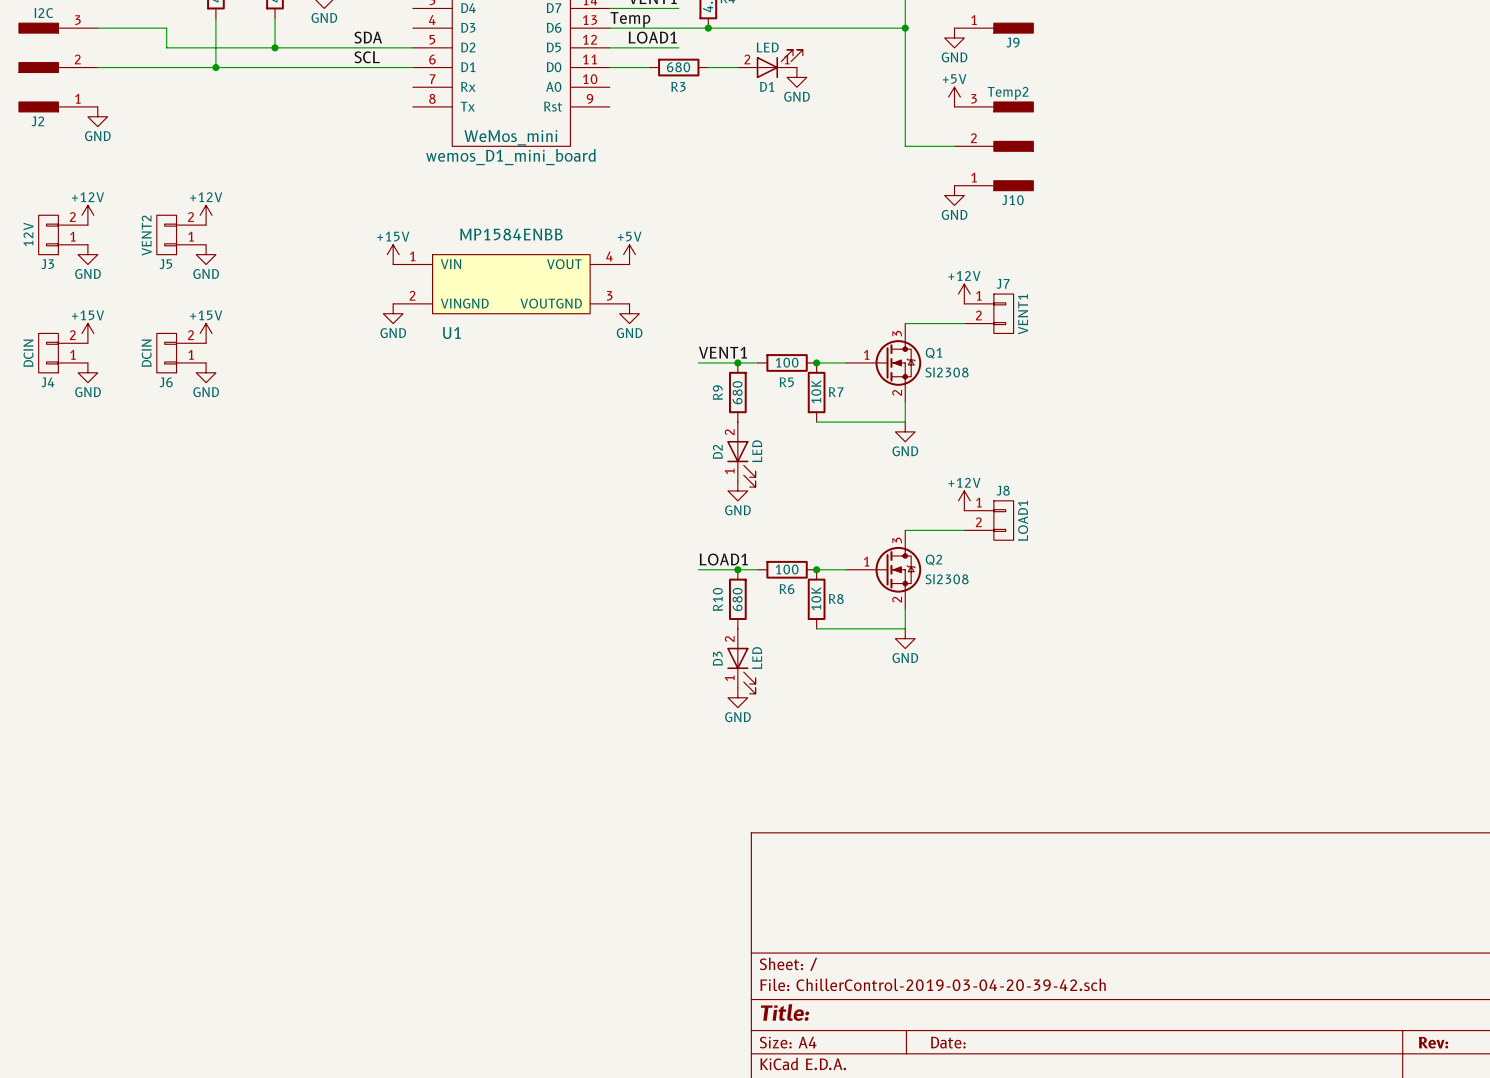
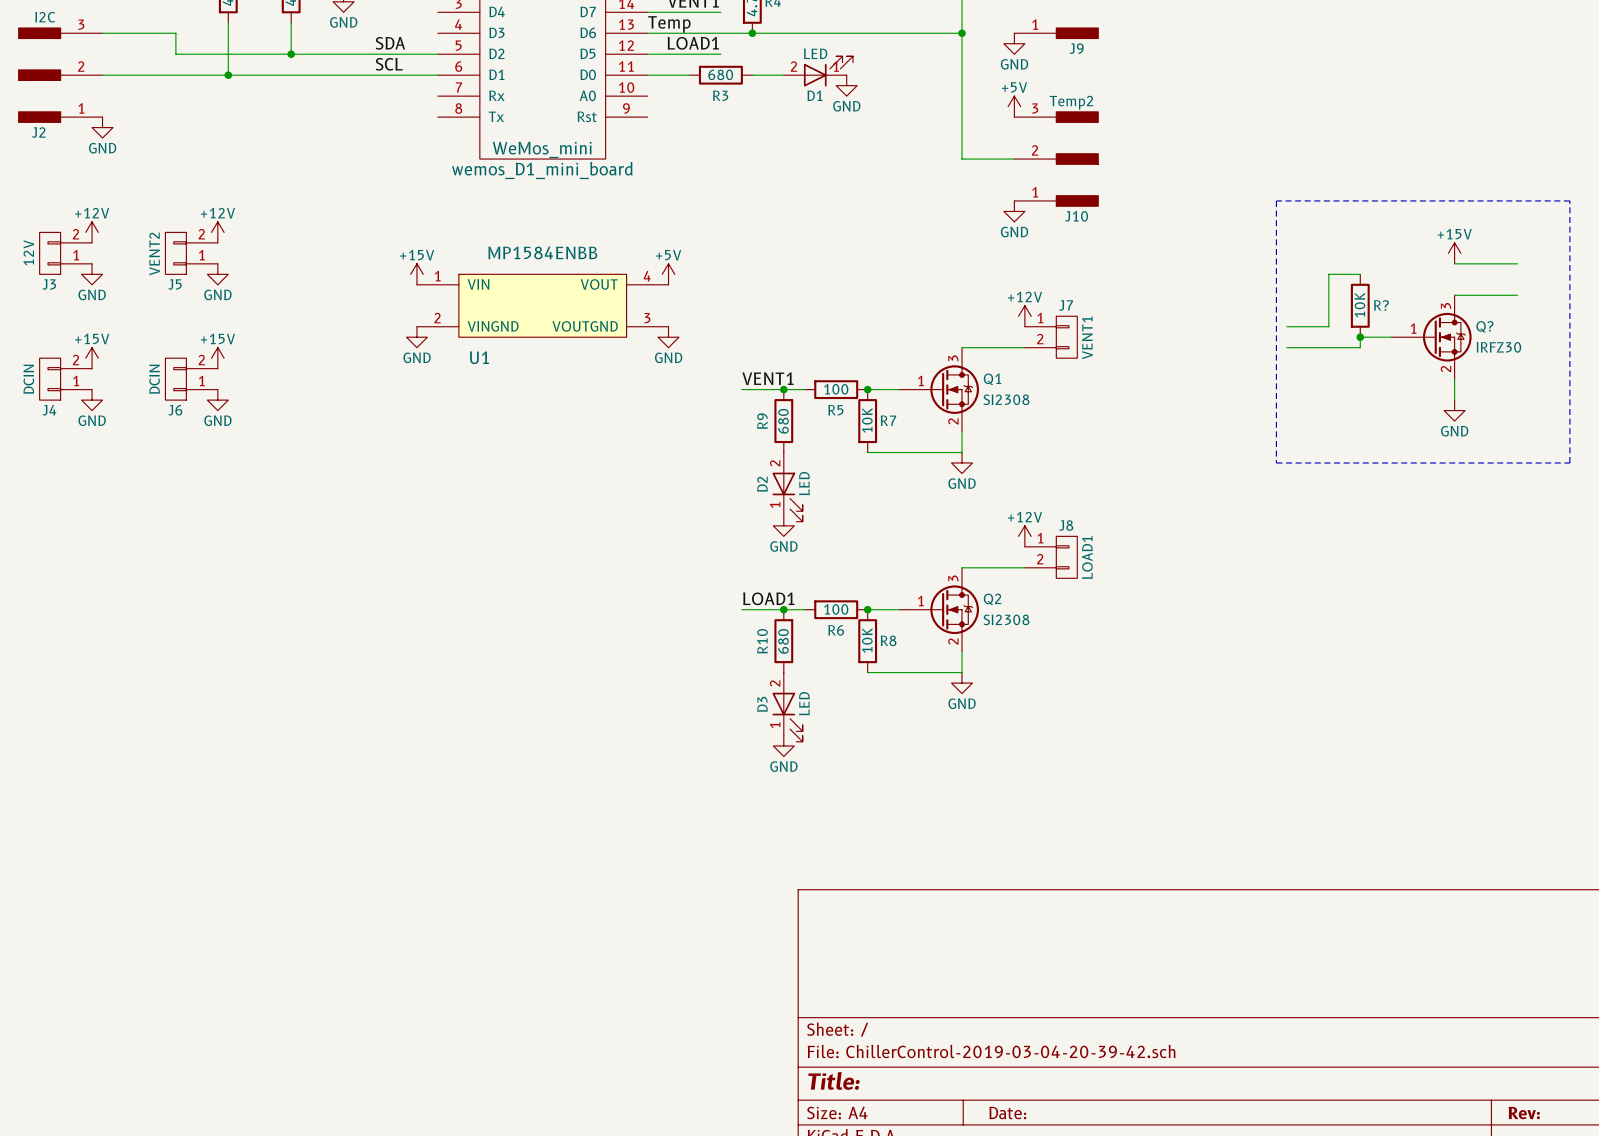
line: none -> (1276, 200) (1276, 462) (1569, 462) (1569, 200) (1276, 200)
power symbol: none -> +15V (1454, 253)
wire: none -> (1454, 263) (1517, 263)
wire: none -> (1360, 274) (1328, 274) (1328, 326) (1286, 326)
wire: none -> (1454, 295) (1517, 295)
R?: none -> 10K (1360, 305)
junction: none -> (1360, 337)
wire: none -> (1391, 337) (1360, 337) (1360, 347) (1286, 347)
Q?: none -> IRFZ30 (1431, 337)
wire: none -> (1454, 379) (1454, 400)
power symbol: none -> GND (1454, 410)

